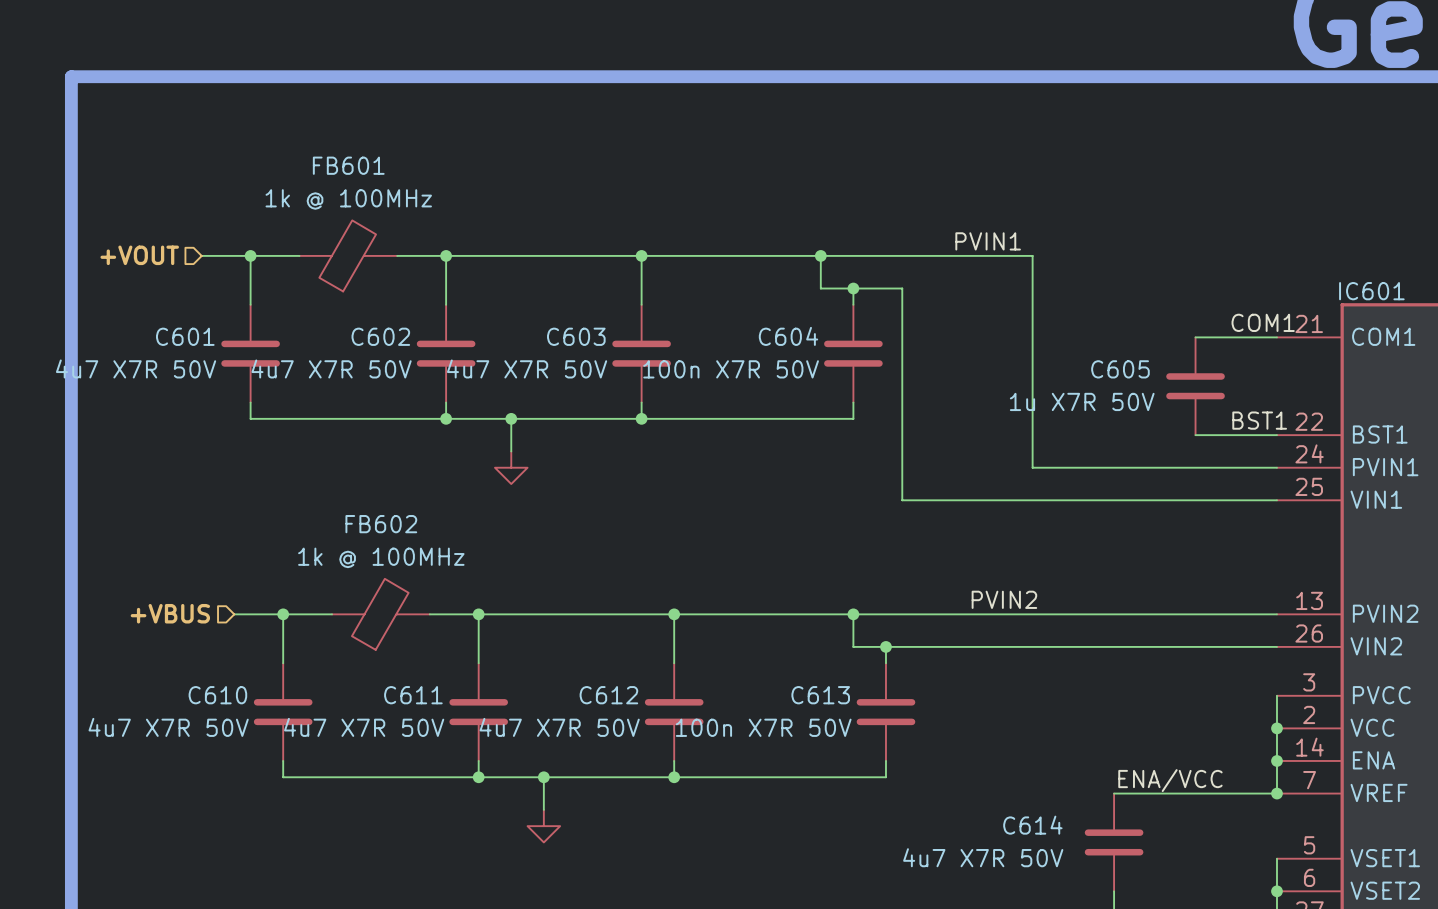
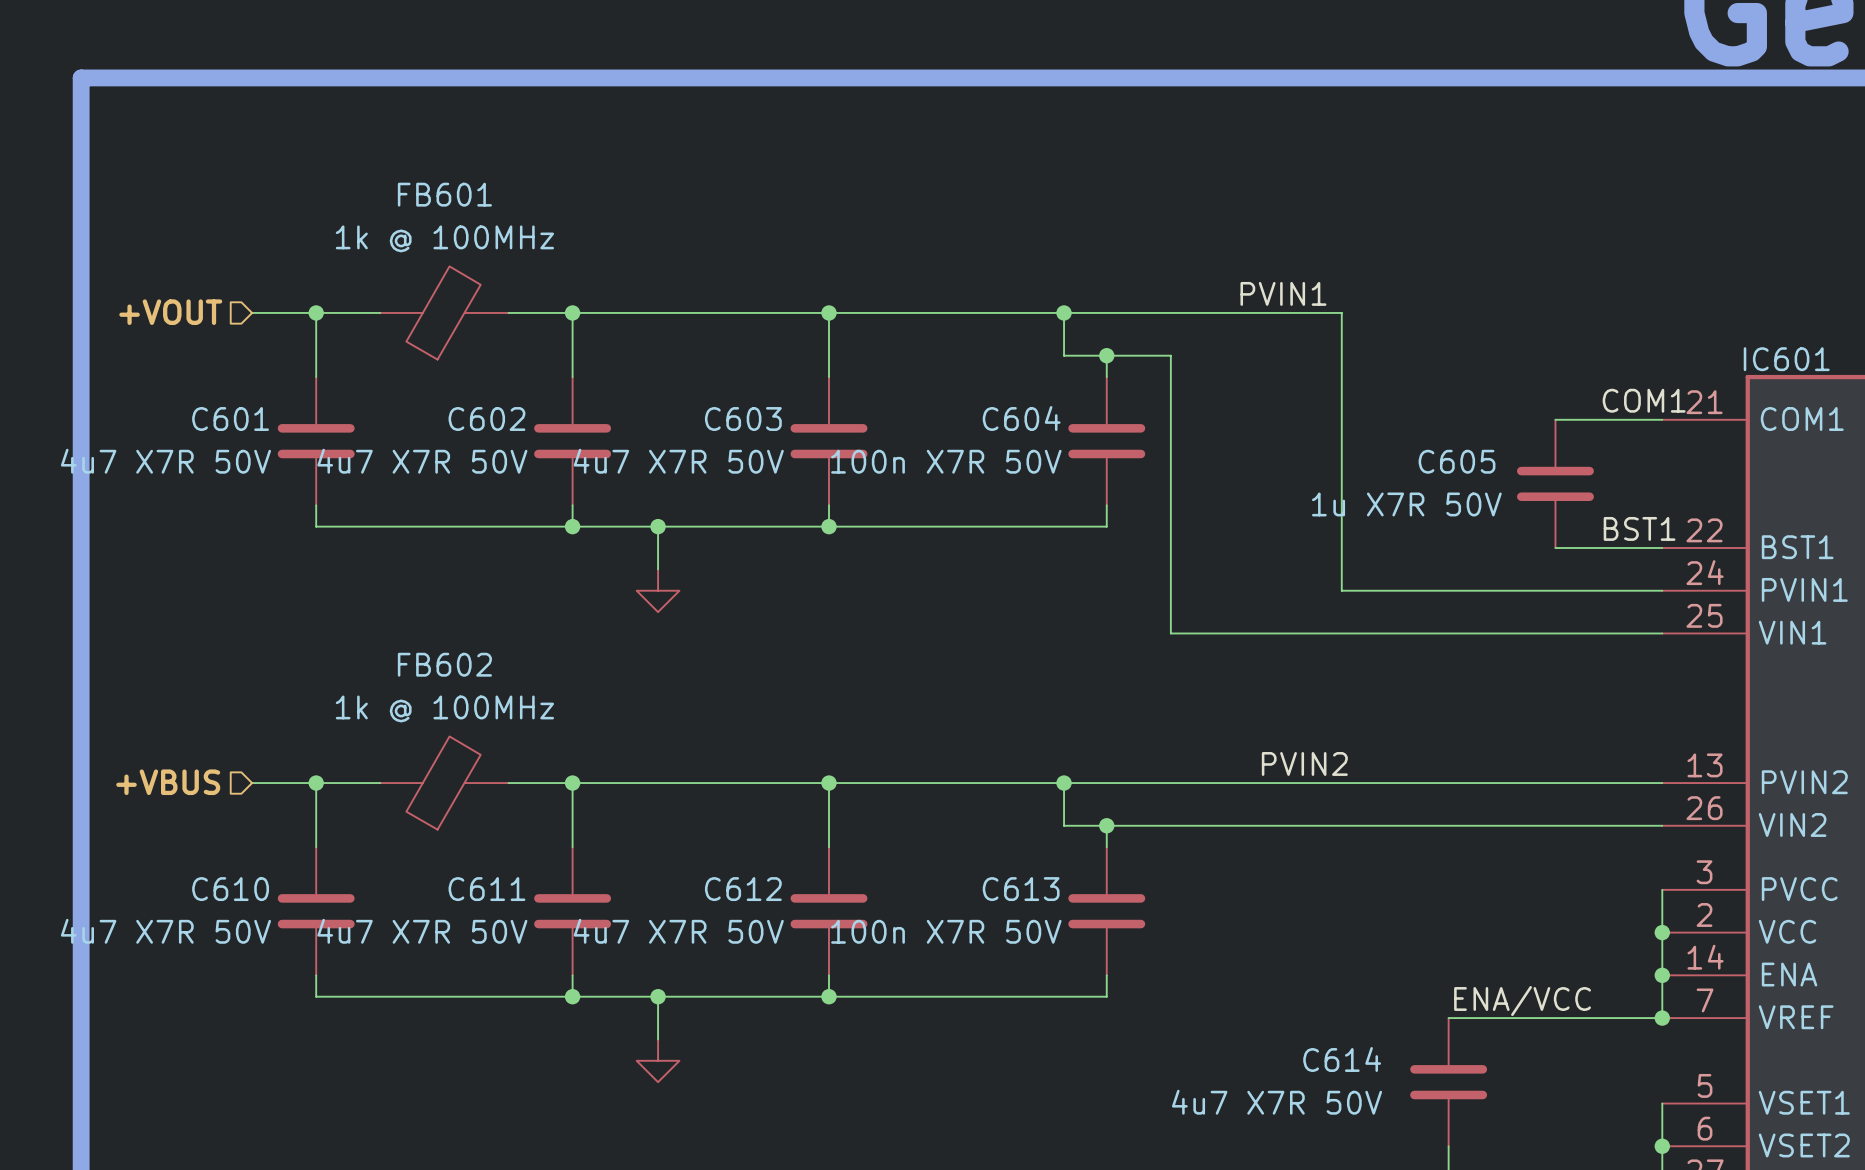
hierarchical label position: +VBUS (170, 613) -> +VBUS (168, 782)
wire: none -> (252, 783) (294, 783)
wire: (283, 614) (283, 663) -> (316, 783) (316, 847)
junction position: (283, 614) -> (316, 783)
FB602 position: (380, 614) -> (444, 783)
wire: (478, 614) (478, 663) -> (572, 783) (572, 847)
junction position: (478, 614) -> (572, 783)
wire: (674, 614) (674, 663) -> (828, 783) (828, 847)
junction position: (674, 614) -> (828, 783)
wire: none -> (1064, 783) (1064, 825) (1106, 825) (1106, 847)
junction: none -> (1064, 783)
wire: (853, 614) (853, 646) -> none
junction: (853, 614) -> none
junction: none -> (1106, 825)
wire: (885, 646) (885, 663) -> none
junction: (885, 646) -> none
C610 position: (283, 712) -> (316, 911)
C611 position: (478, 712) -> (572, 911)
C612 position: (674, 712) -> (828, 911)
C613 position: (885, 712) -> (1106, 911)
wire: (283, 760) (283, 777) -> (316, 975) (316, 996) (358, 996)
wire: (478, 760) (478, 777) -> (572, 975) (572, 996)
wire: (674, 760) (674, 777) -> (828, 975) (828, 996)
wire: (885, 760) (885, 777) (853, 777) -> (1106, 975) (1106, 996)
junction: none -> (572, 996)
junction: (478, 777) -> none
junction: none -> (658, 996)
wire: (543, 777) (543, 809) -> (658, 996) (658, 1039)
junction: (543, 777) -> none
junction position: (674, 777) -> (828, 996)
power symbol position: (543, 826) -> (658, 1060)

